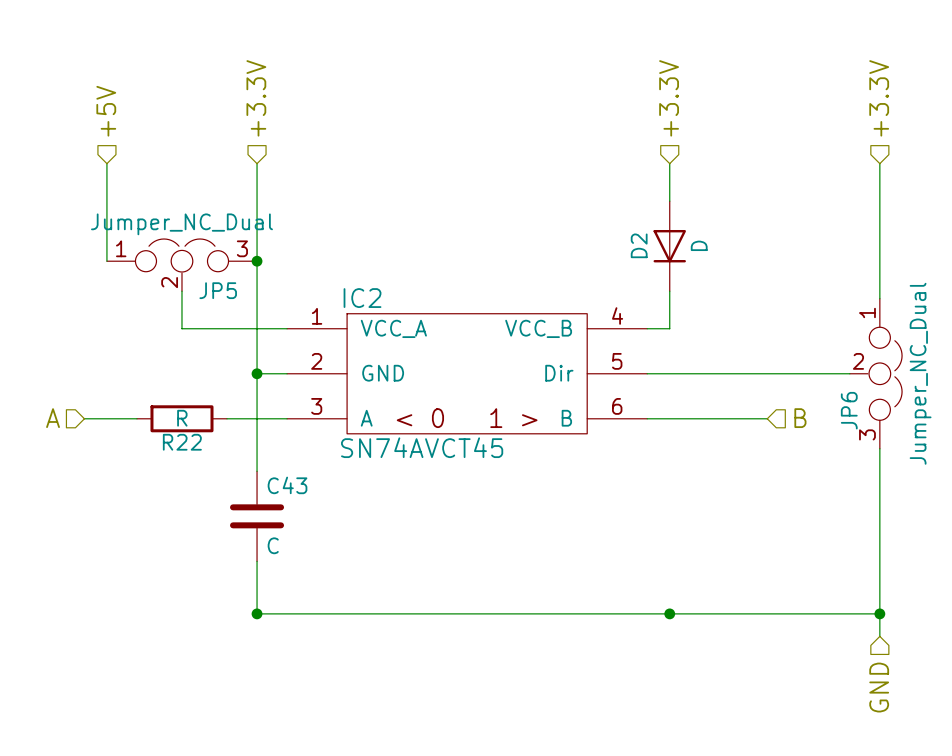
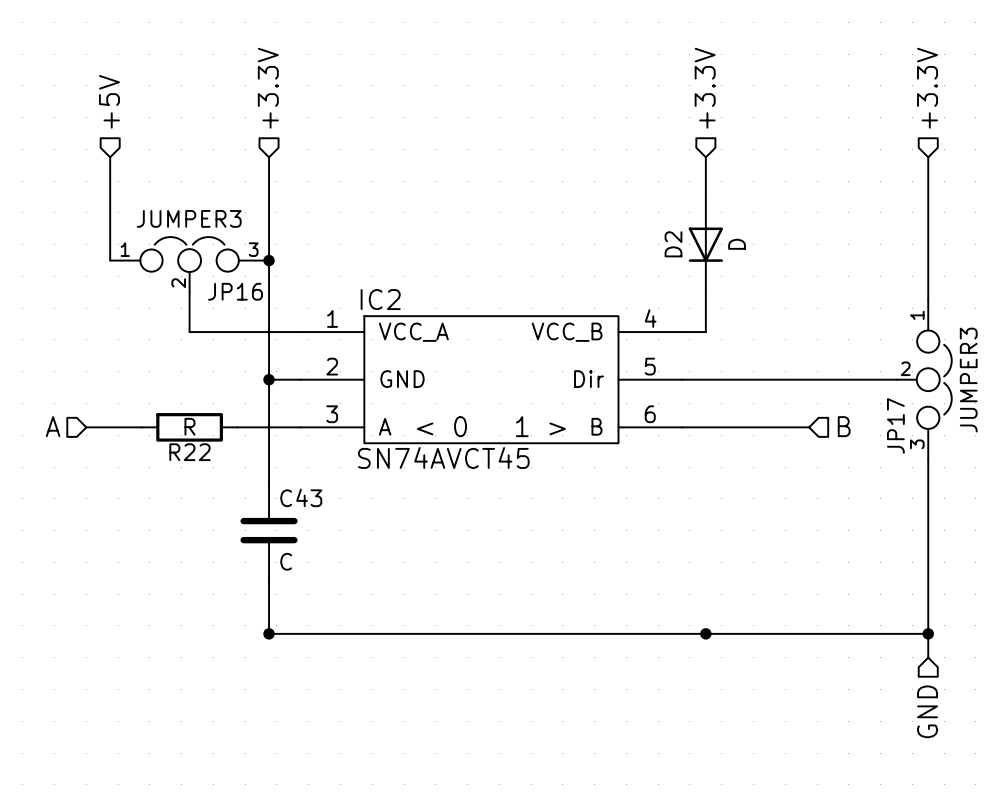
JP5 value: Jumper_NC_Dual (181, 224) -> JUMPER3 (189, 218)
JP5 symbol: [106, 238, 258, 292] -> [110, 237, 270, 293]
JP5 name: JP5 (218, 290) -> JP16 (235, 291)
JP6 symbol: [849, 298, 903, 449] -> [896, 300, 952, 460]
JP6 value: Jumper_NC_Dual (920, 373) -> JUMPER3 (968, 380)
JP6 name: JP6 (849, 410) -> JP17 (895, 425)

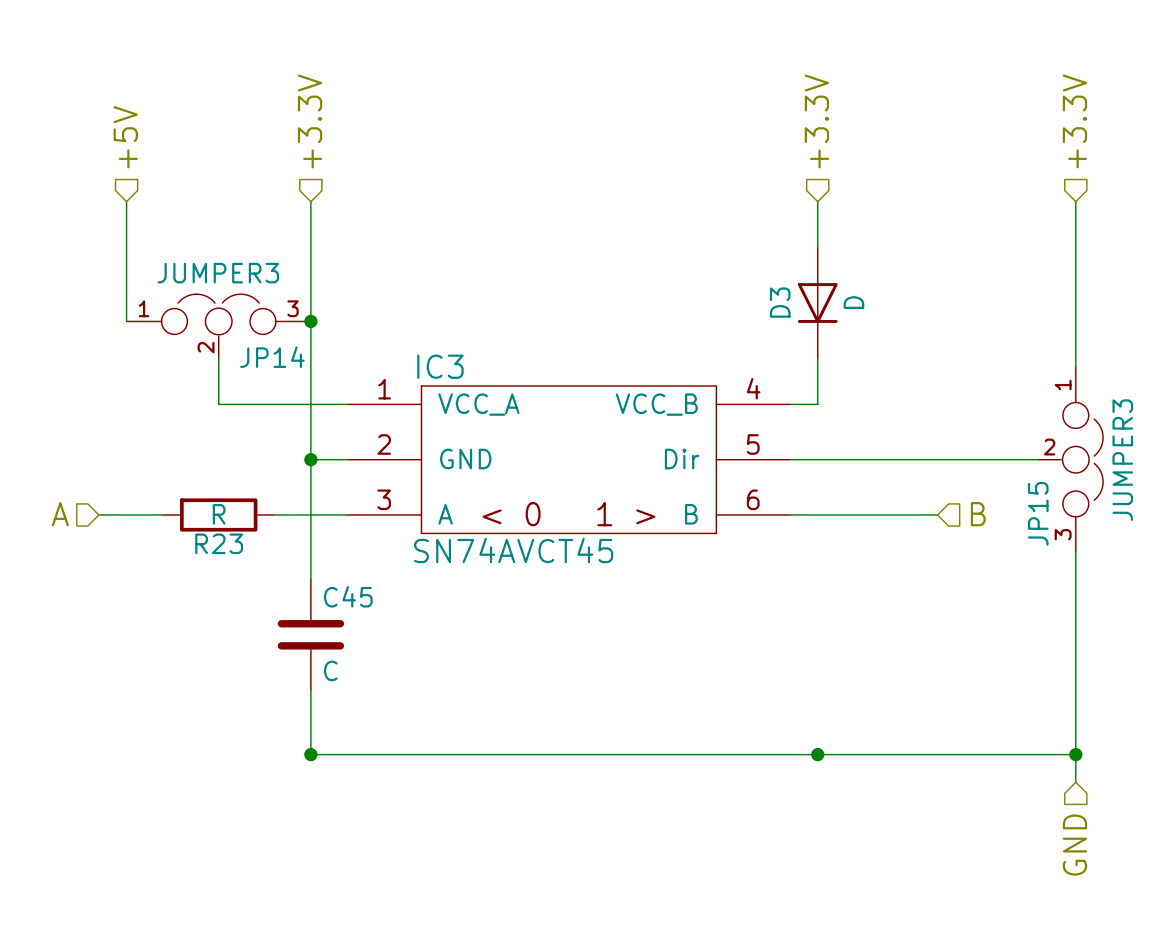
D2 name: D2 (673, 244) -> D3 (780, 302)
JP16 name: JP16 (235, 291) -> JP14 (272, 357)
IC2 name: IC2 (380, 299) -> IC3 (440, 366)
JP17 name: JP17 (895, 425) -> JP15 (1038, 513)
R22 name: R22 (189, 452) -> R23 (219, 543)
C43 name: C43 (301, 497) -> C45 (348, 596)

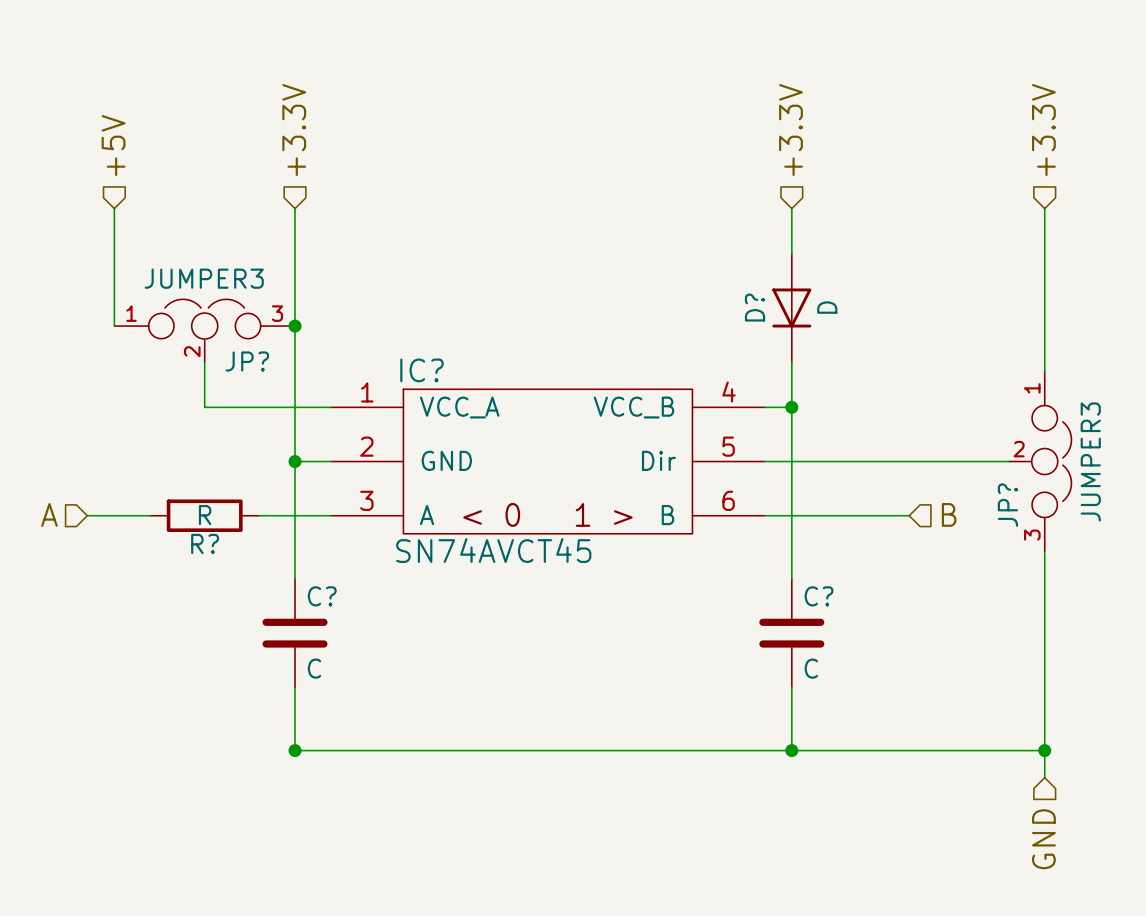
D3 name: D3 (780, 302) -> D? (755, 307)
JP14 name: JP14 (272, 357) -> JP? (247, 361)
IC3 name: IC3 (440, 366) -> IC? (421, 370)
wire: none -> (791, 407) (791, 578)
junction: none -> (791, 407)
JP15 name: JP15 (1038, 513) -> JP? (1007, 505)
R23 name: R23 (219, 543) -> R? (205, 543)
C45 name: C45 (348, 596) -> C? (322, 596)
C?: none -> C (791, 633)
wire: none -> (791, 687) (791, 750)

